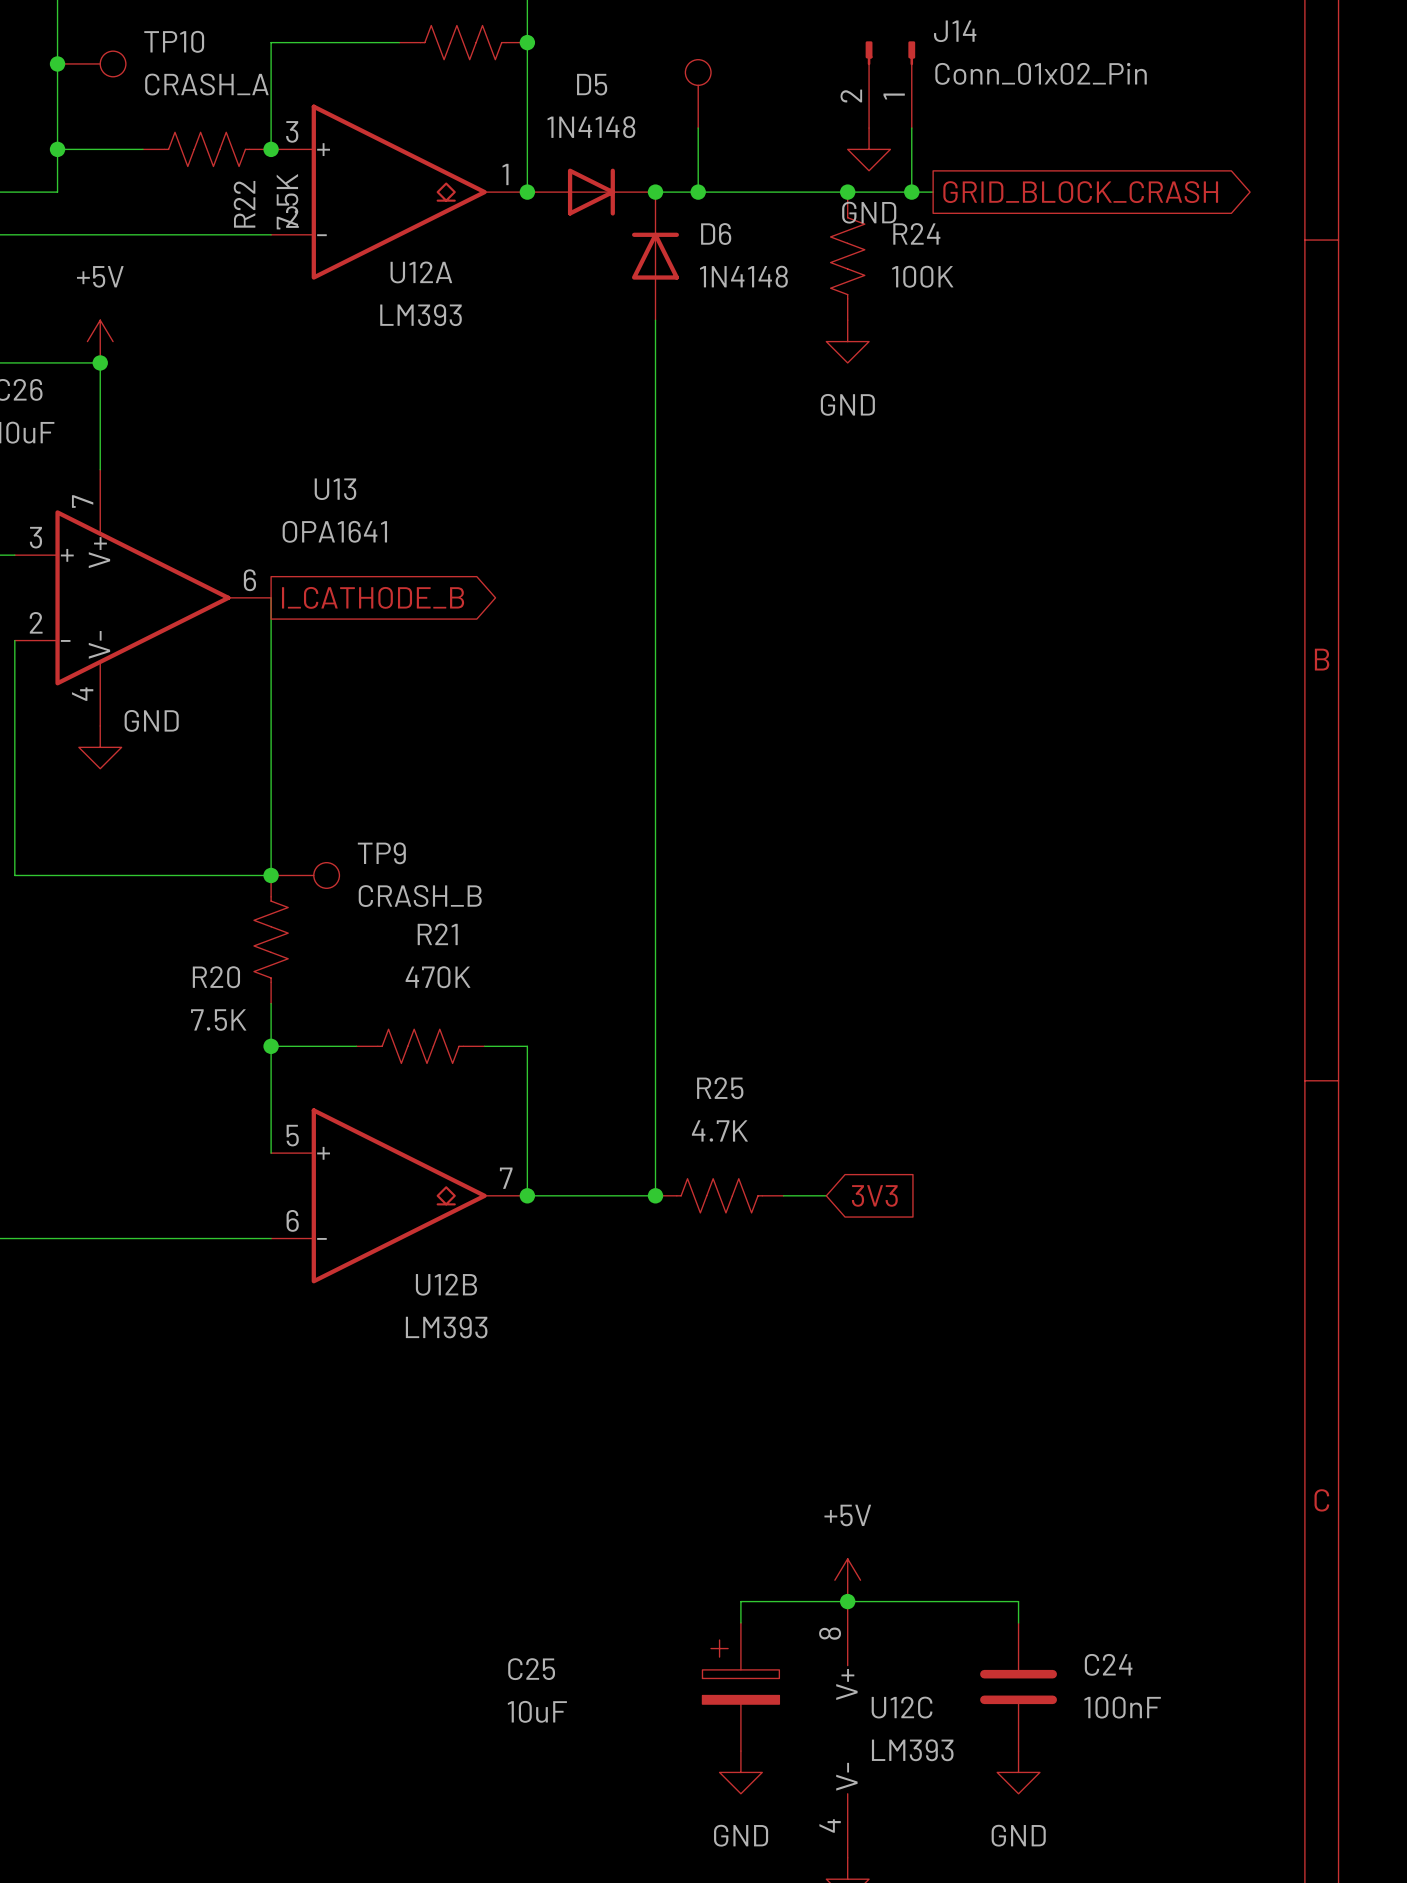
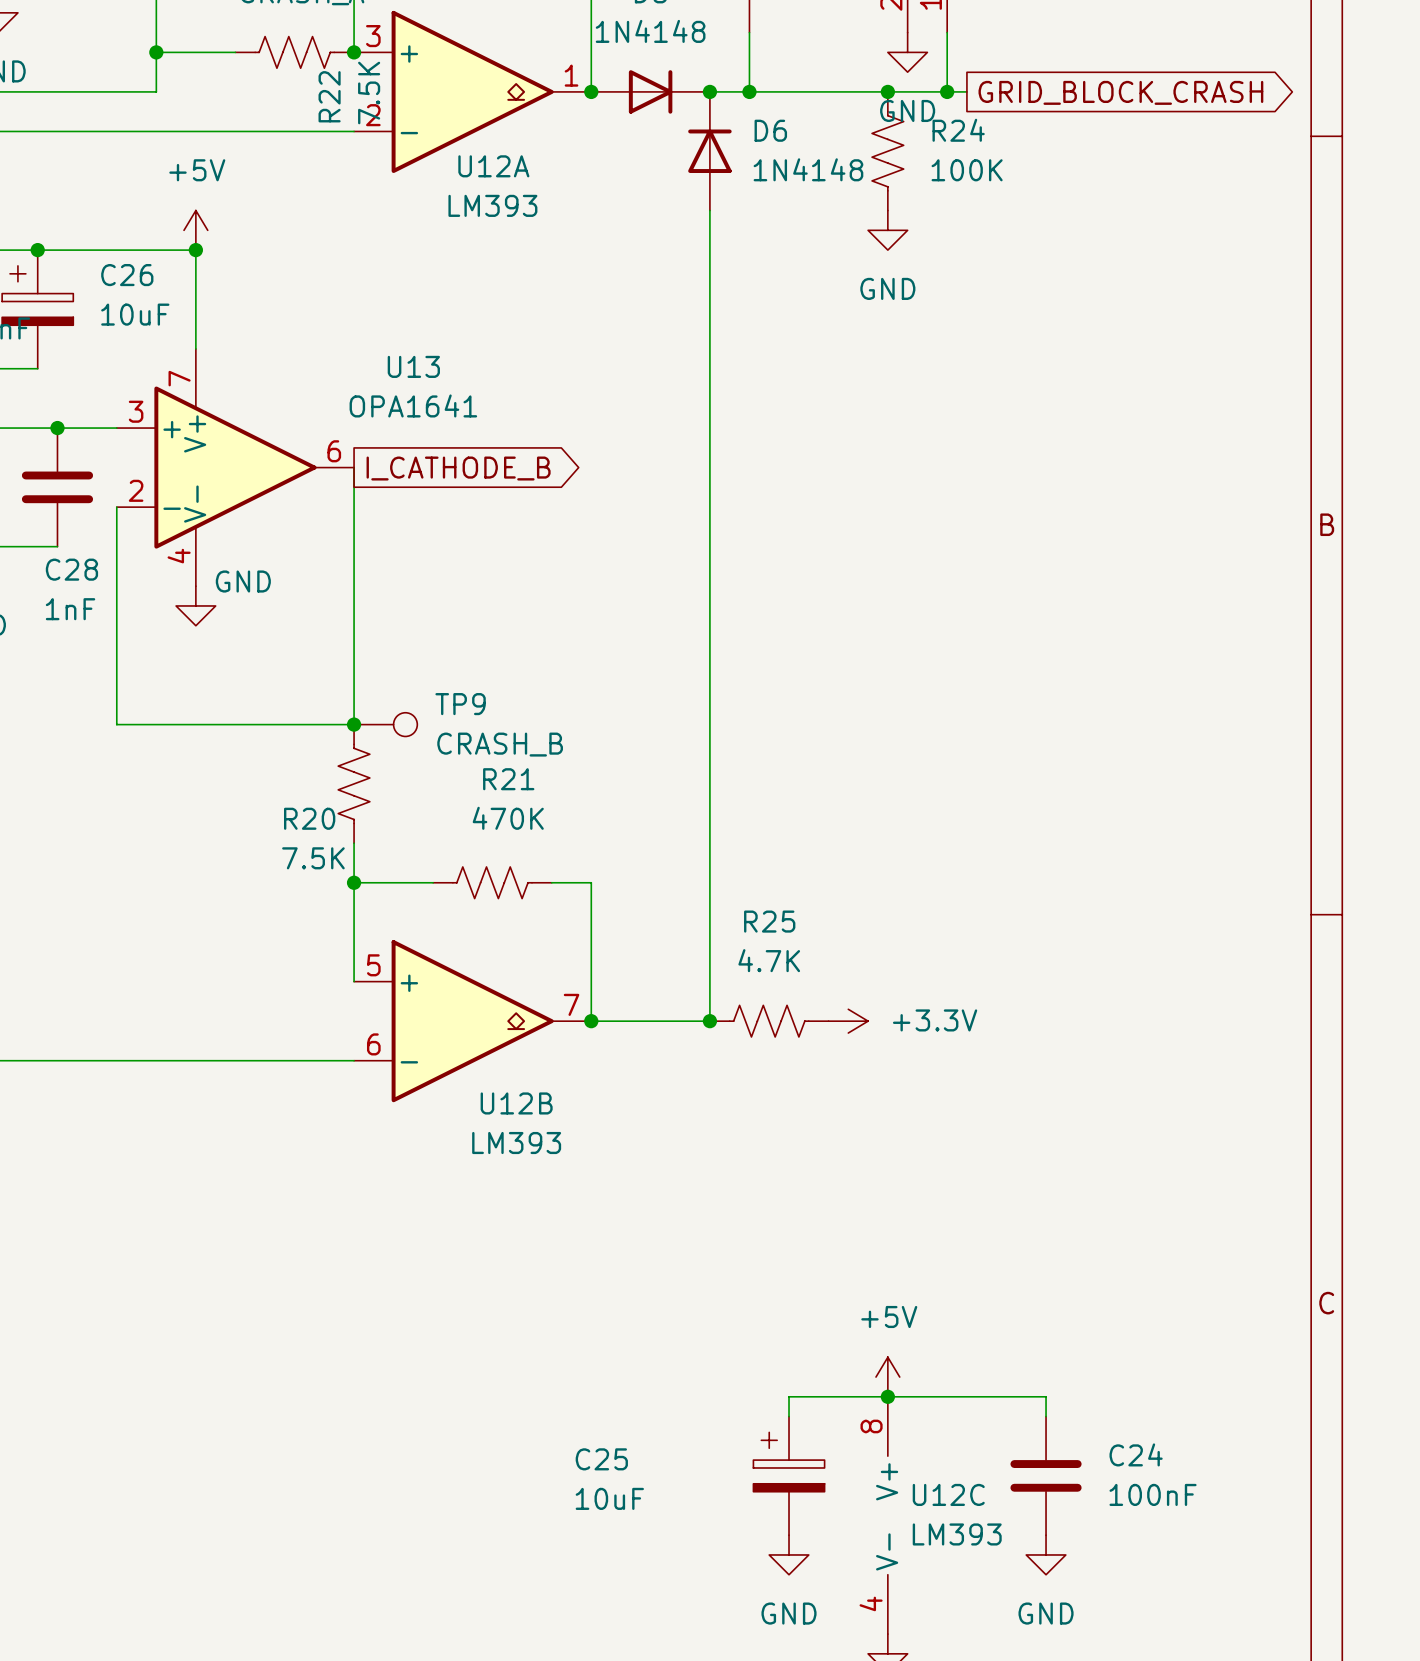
power symbol: none -> +3.3V (848, 1021)
global label: 3V3 (874, 1195) -> none

